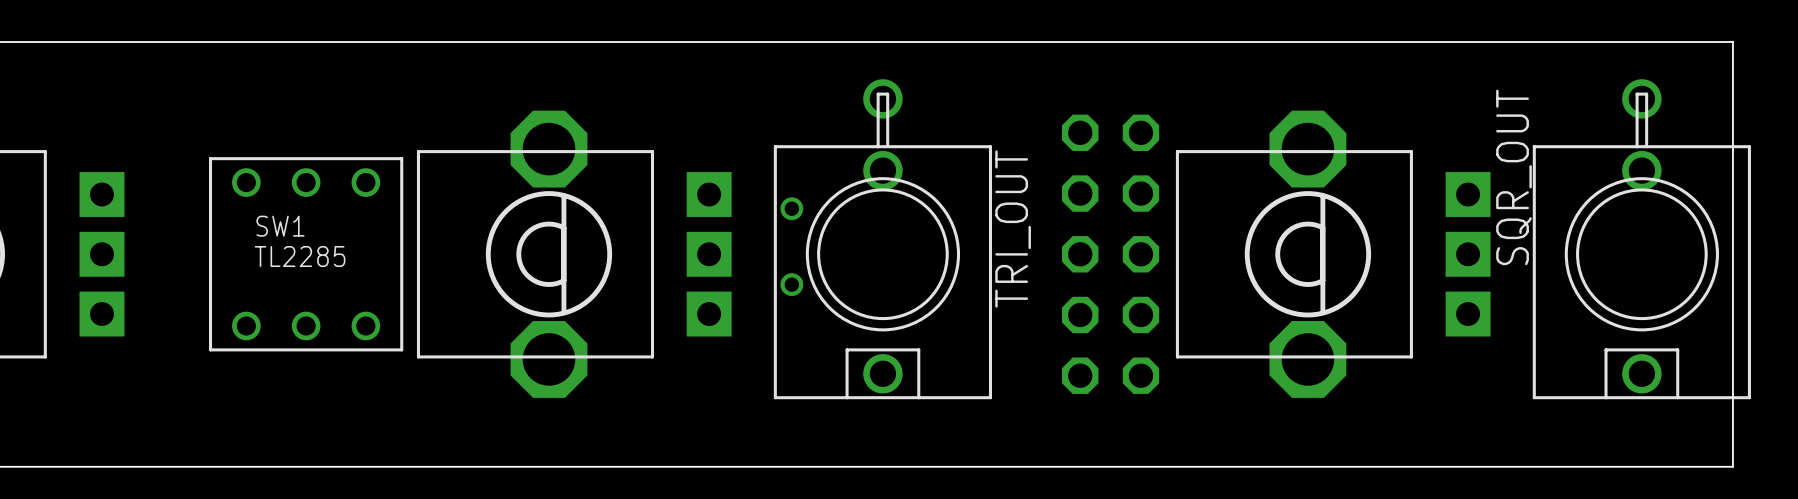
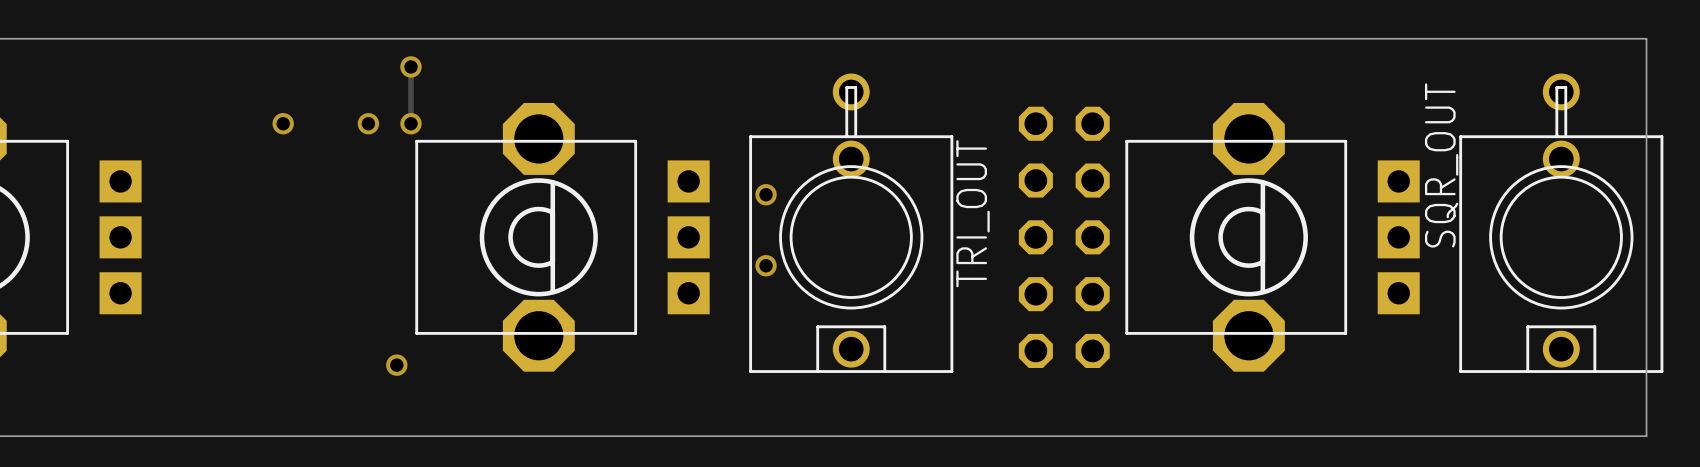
track: none -> (411, 66) (411, 123)
via: none -> (411, 66)
via: none -> (283, 123)
via: none -> (368, 123)
via: none -> (411, 123)
SW1: TL2285 (306, 254) -> none
via: none -> (396, 365)

